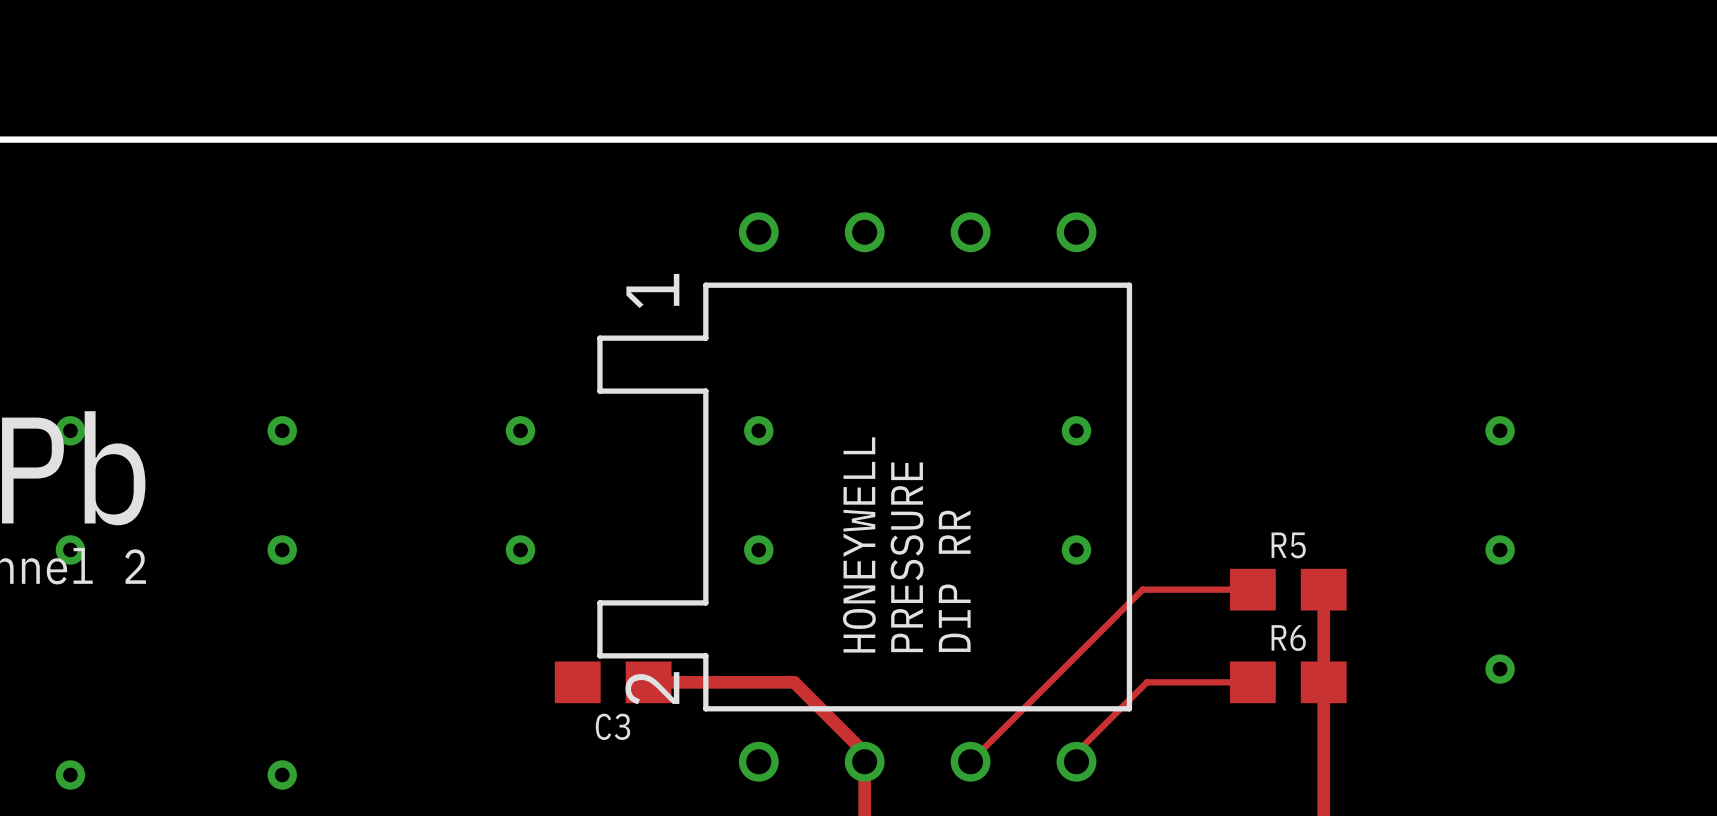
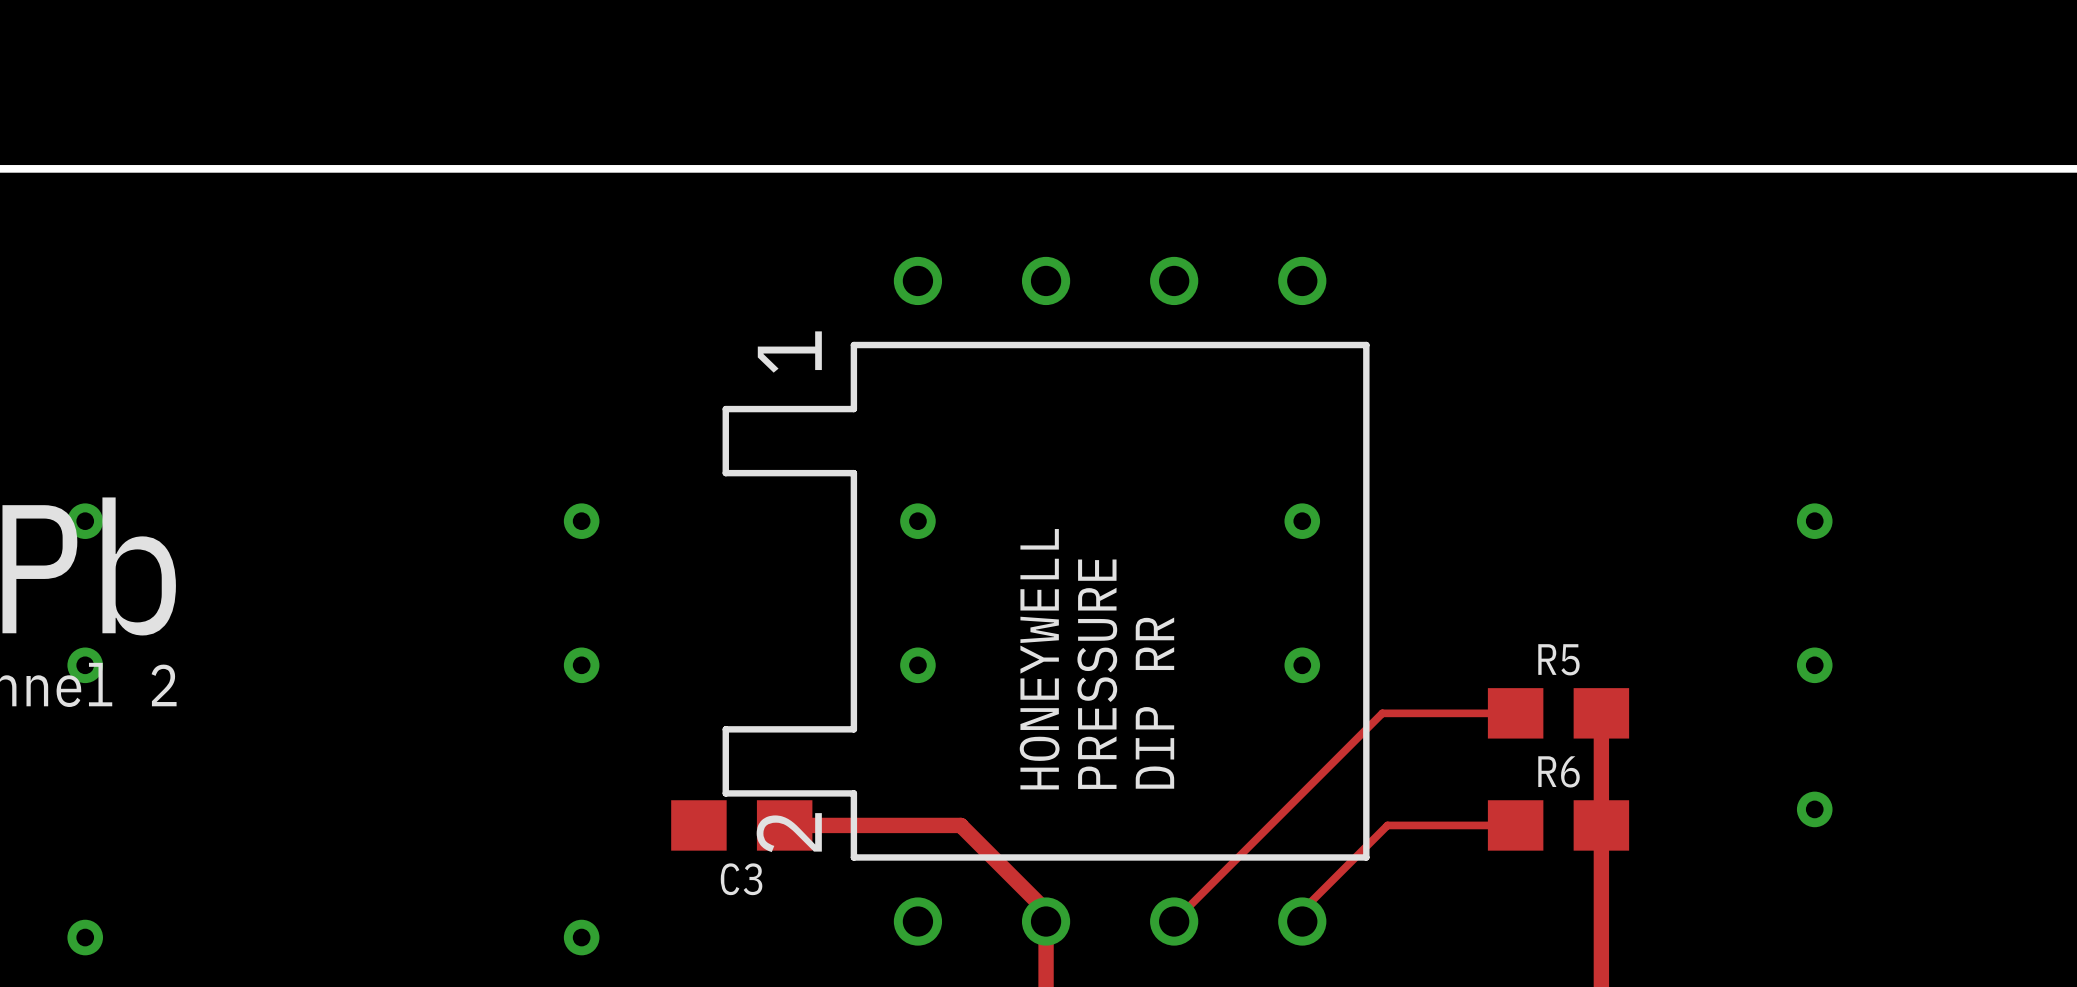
via: (282, 430) -> none
via position: (520, 430) -> (581, 521)
via: (282, 549) -> none
via position: (520, 549) -> (581, 665)
via: (282, 774) -> none
via: none -> (581, 937)

